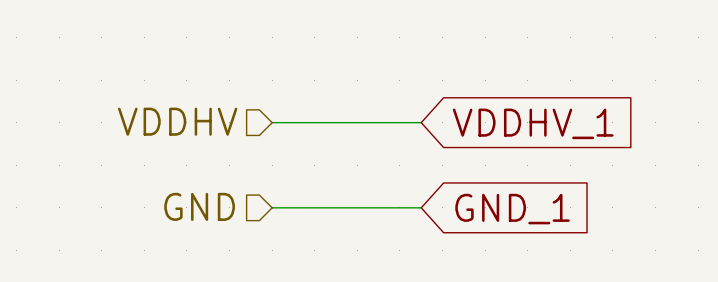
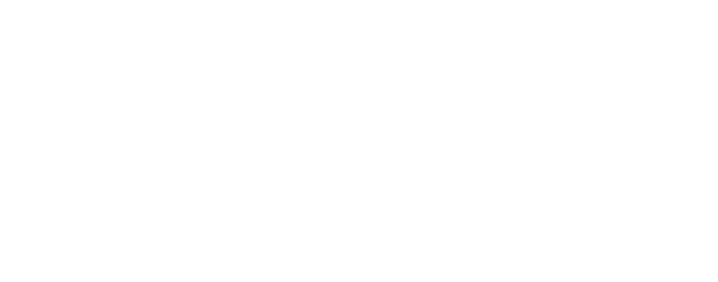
hierarchical label: VDDHV (177, 121) -> none
wire: (272, 122) (421, 122) -> none
global label: VDDHV_1 (533, 123) -> none
hierarchical label: GND (199, 206) -> none
wire: (272, 207) (421, 207) -> none
global label: GND_1 (512, 209) -> none

